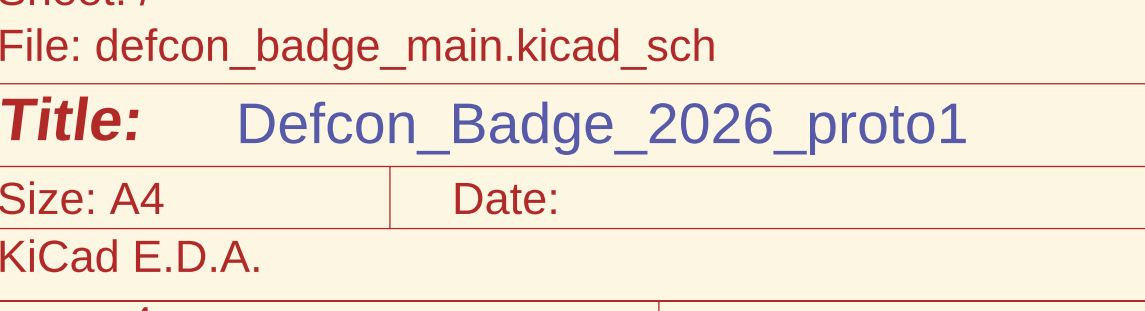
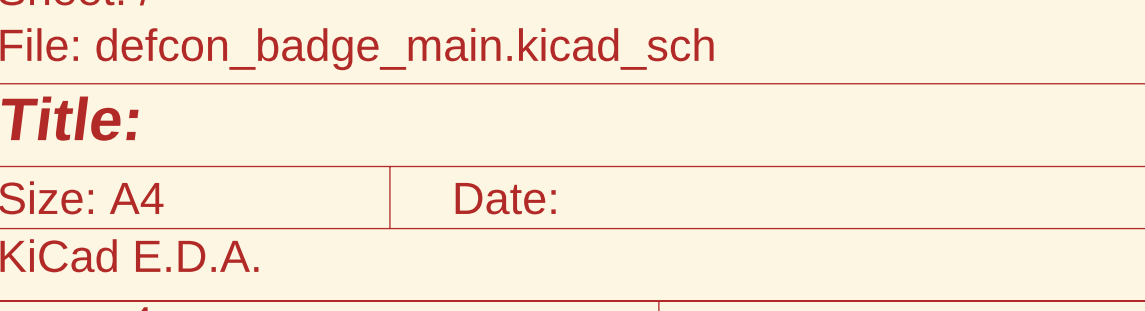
text: Defcon_Badge_2026_proto1 (603, 128) -> none

